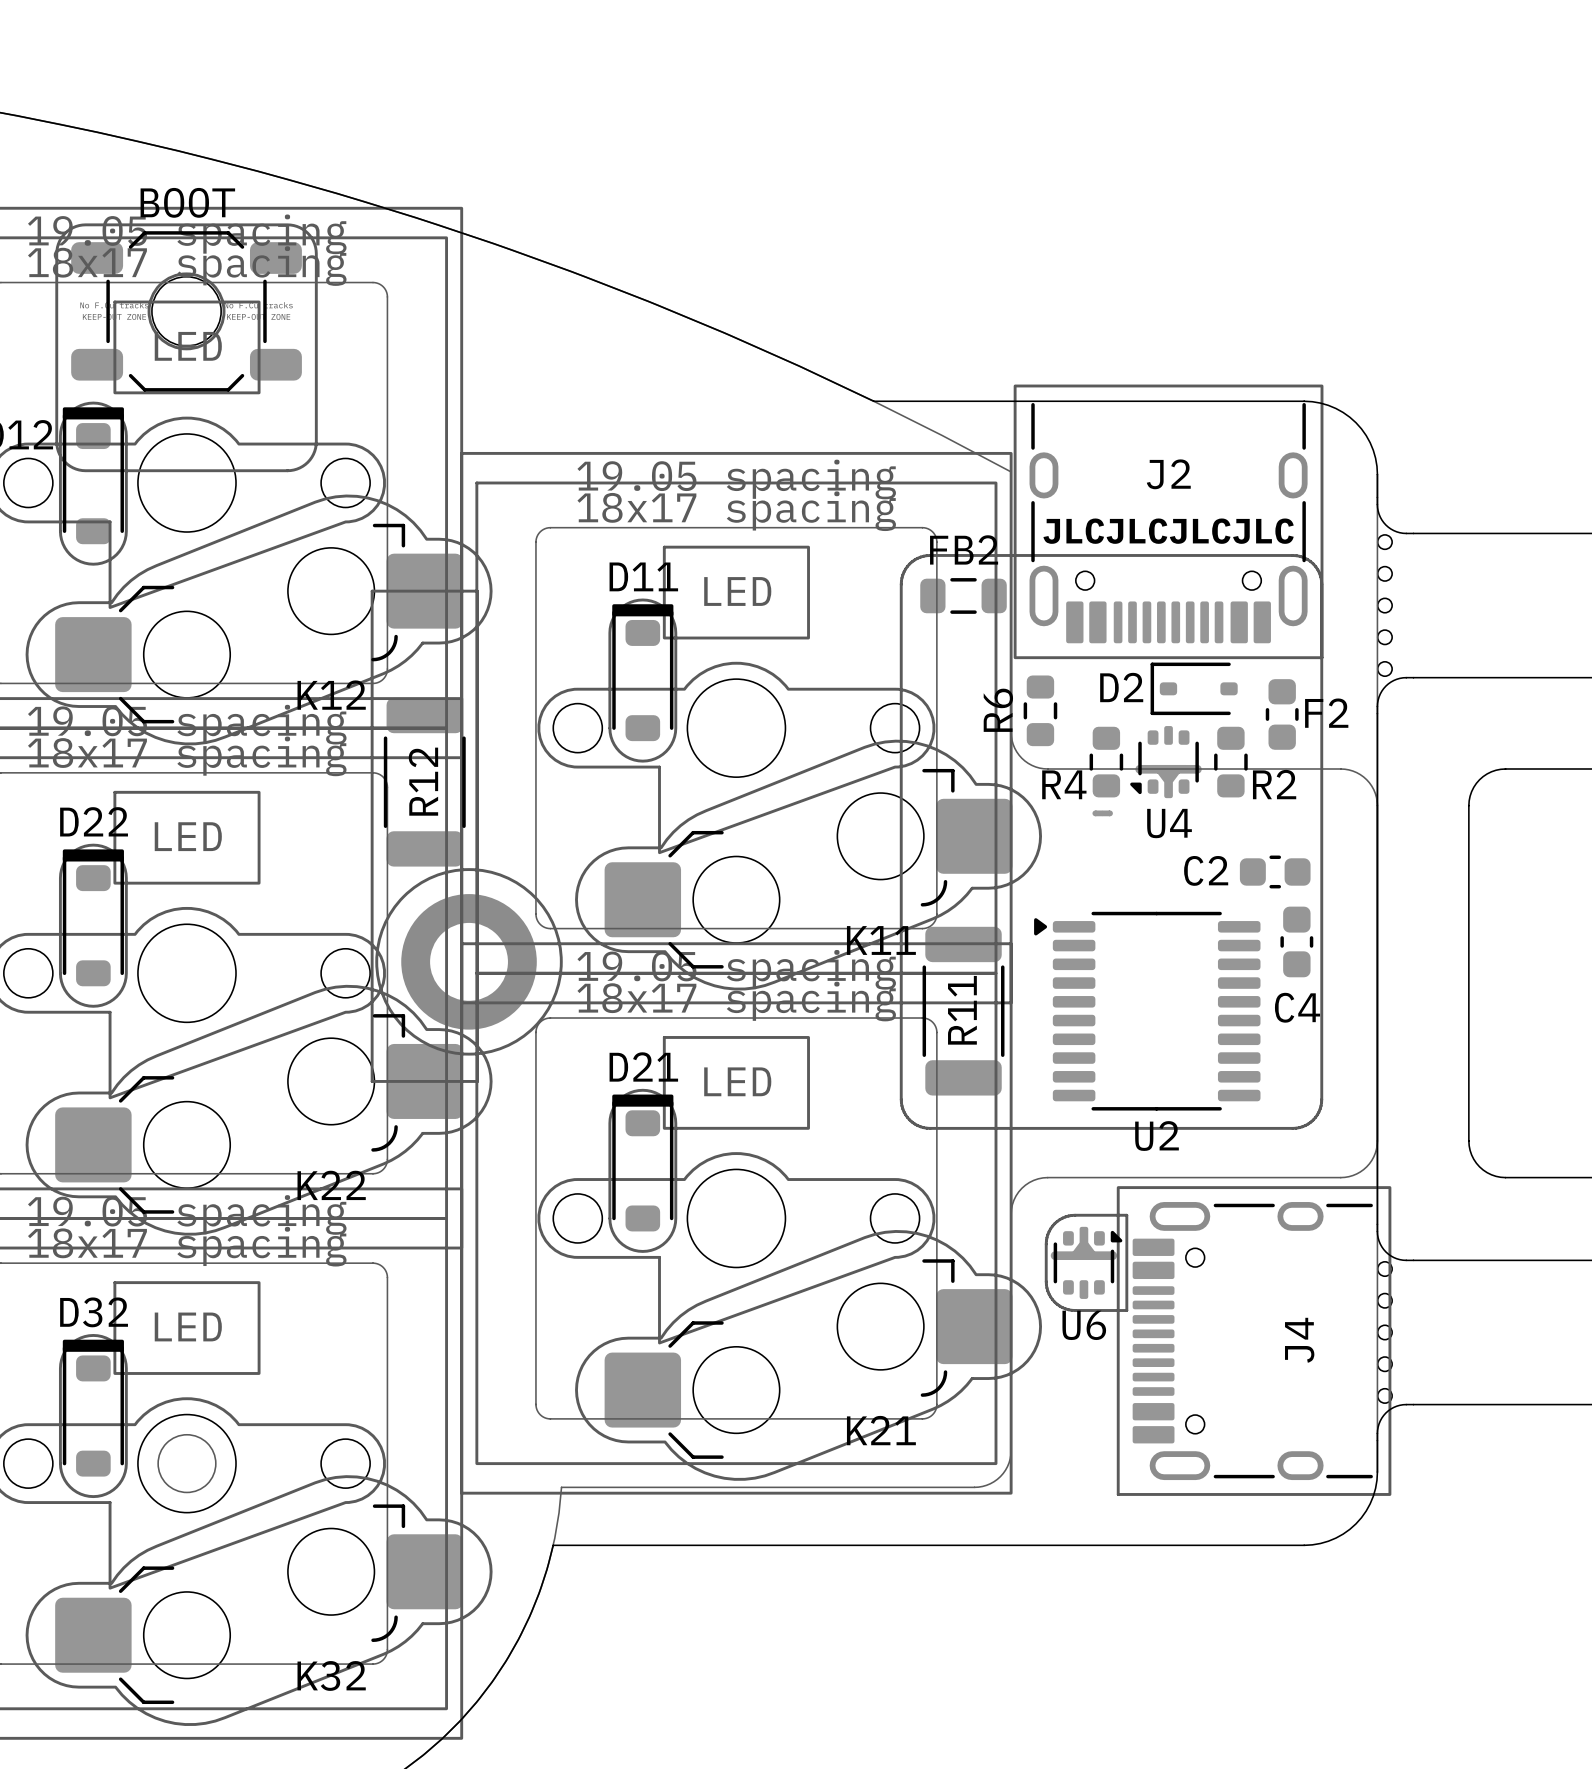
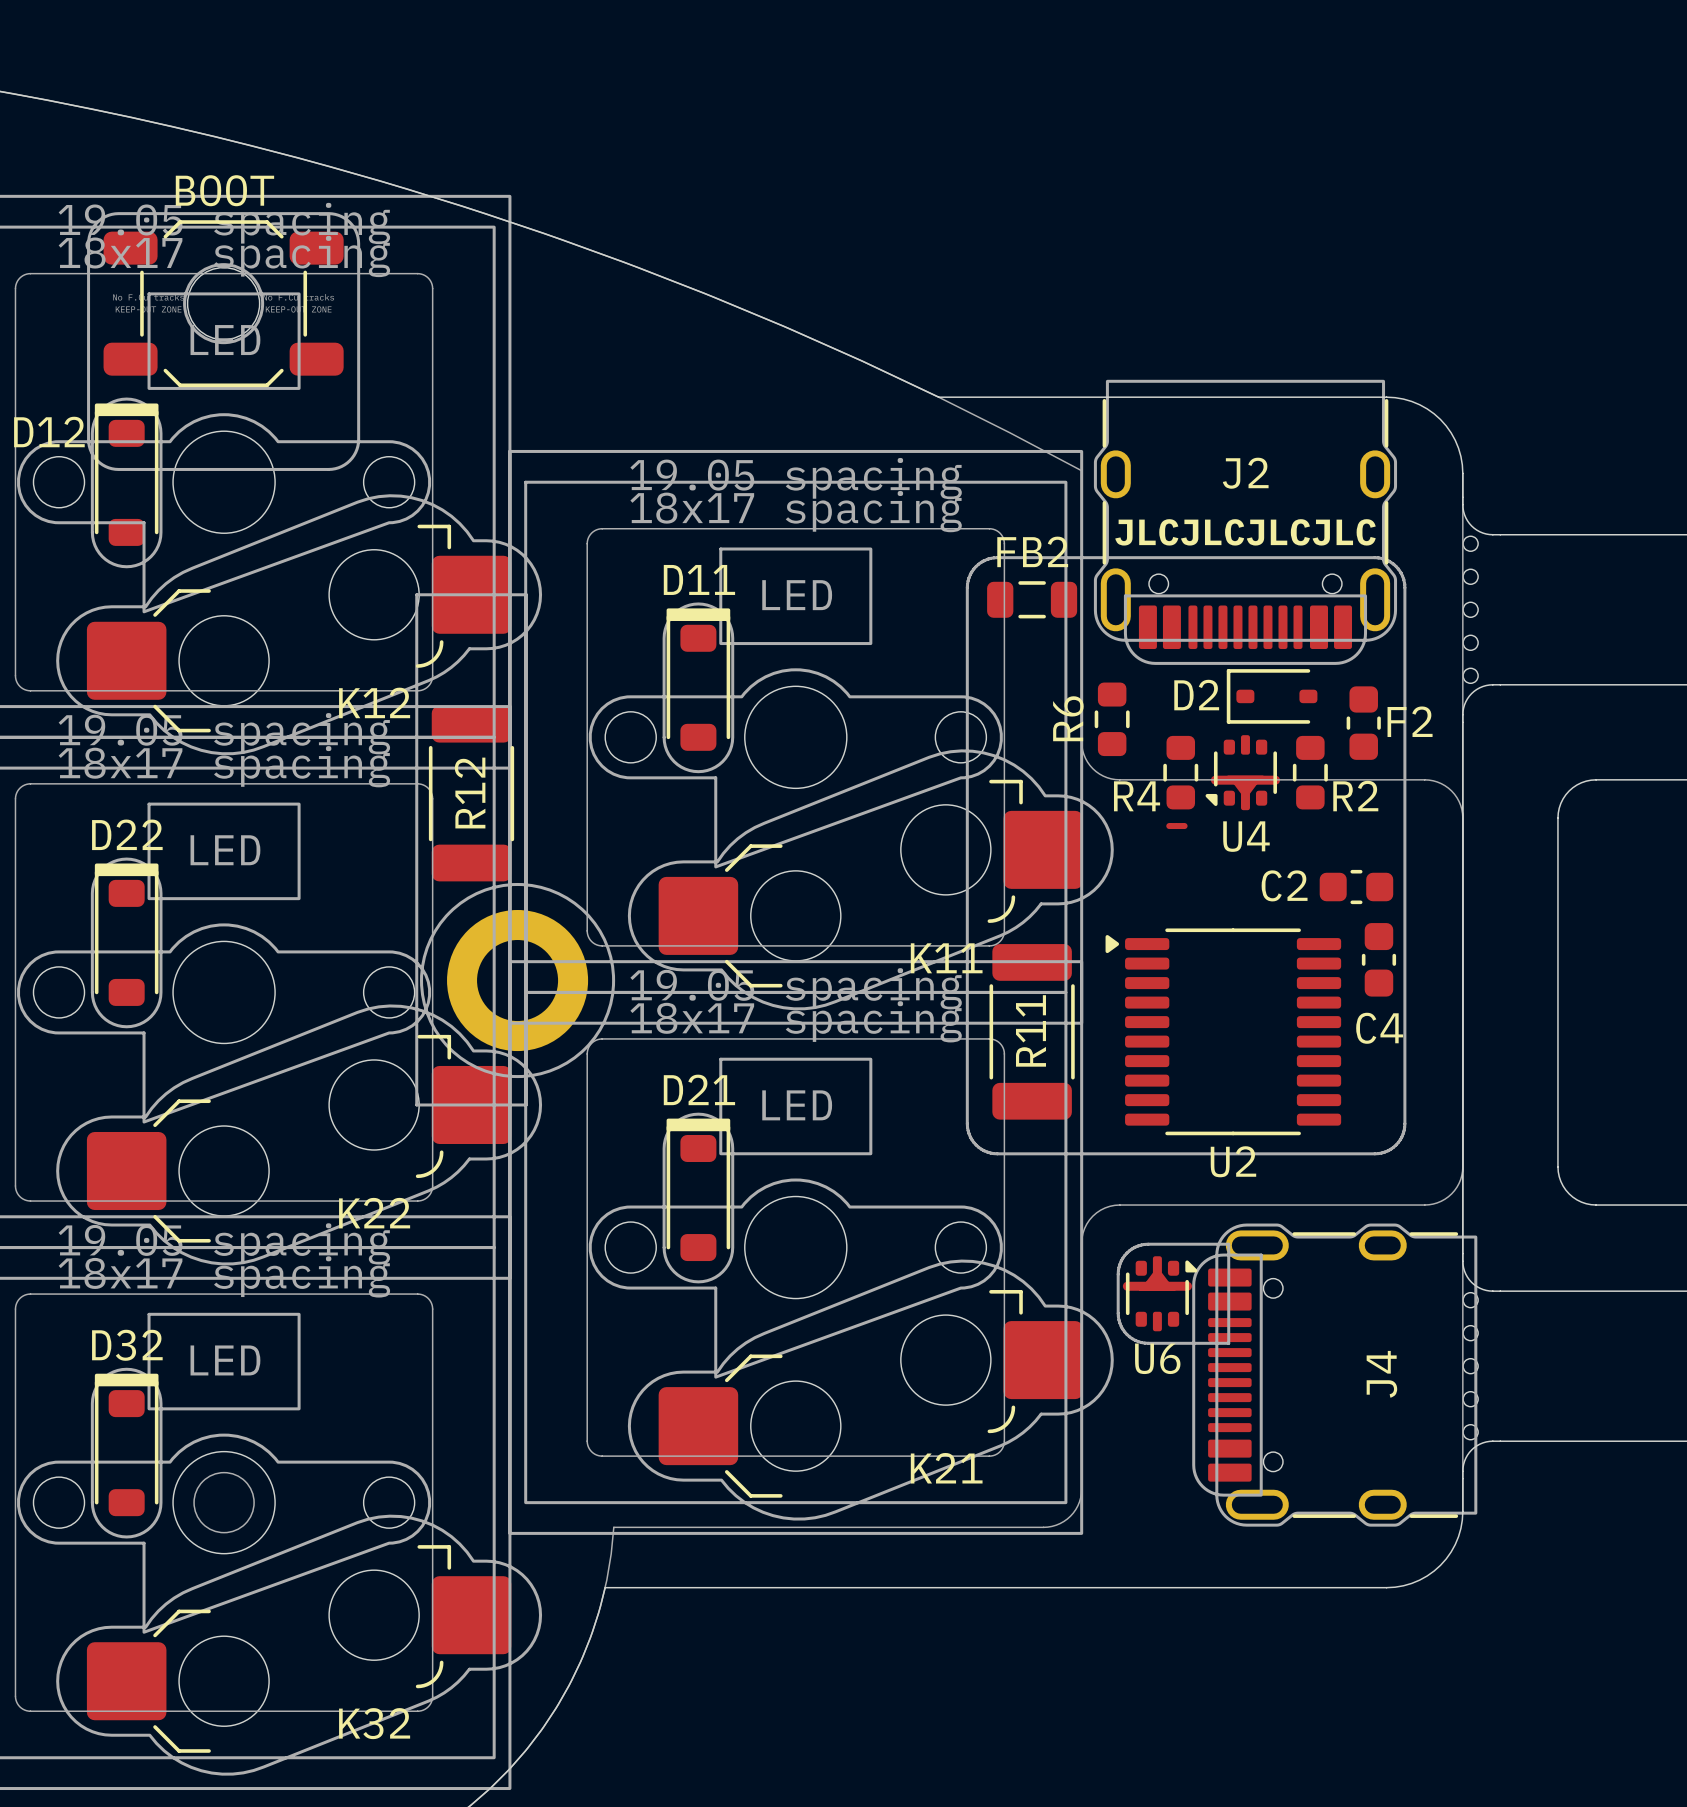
J2 footprint: [1013, 384, 1324, 660] -> [1093, 379, 1398, 665]
J4 footprint: [1116, 1186, 1392, 1496] -> [1192, 1223, 1478, 1527]
line: (1126, 1215) (1126, 1310) -> (1202, 1244) (1228, 1244) (1228, 1343) (1202, 1343)

